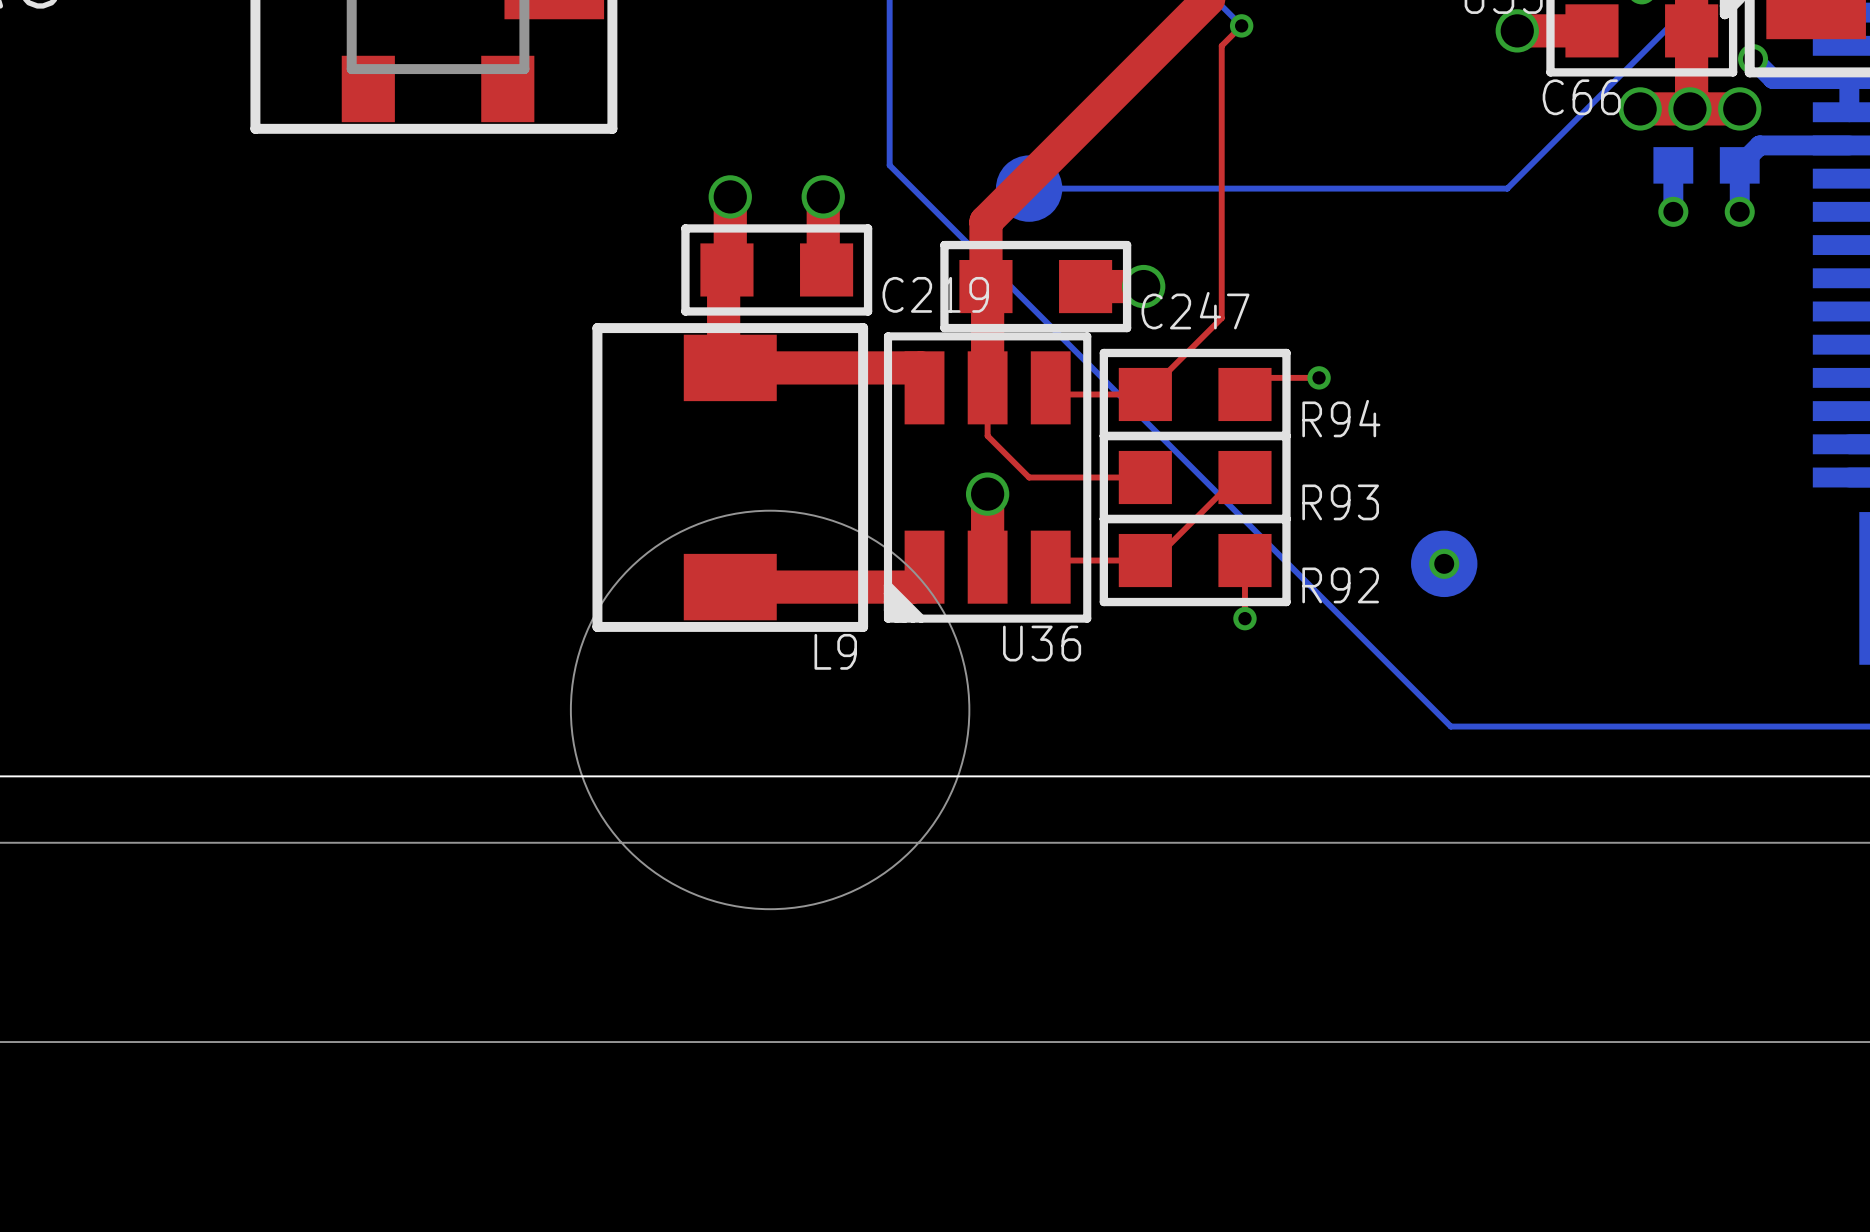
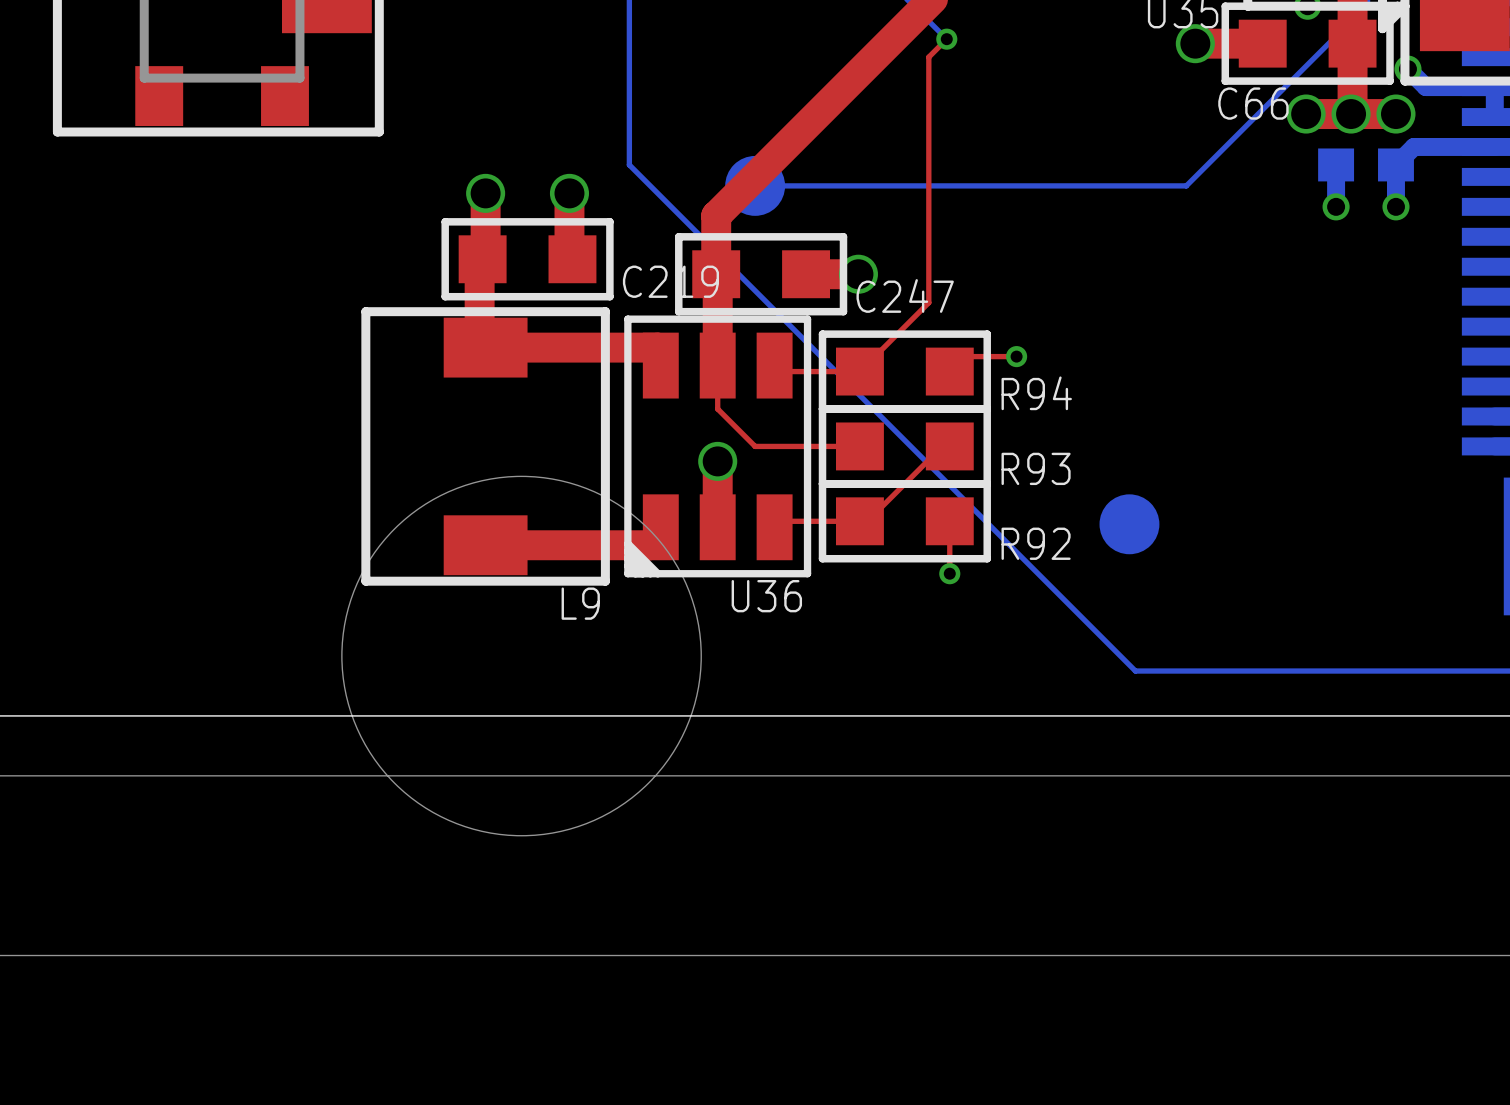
via: (1444, 563) -> none

